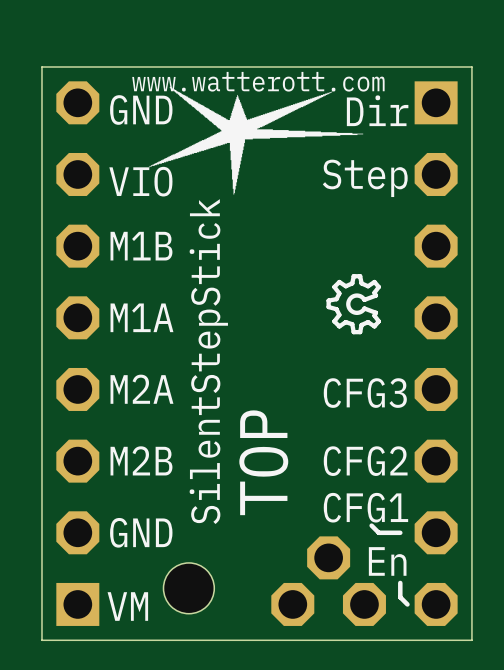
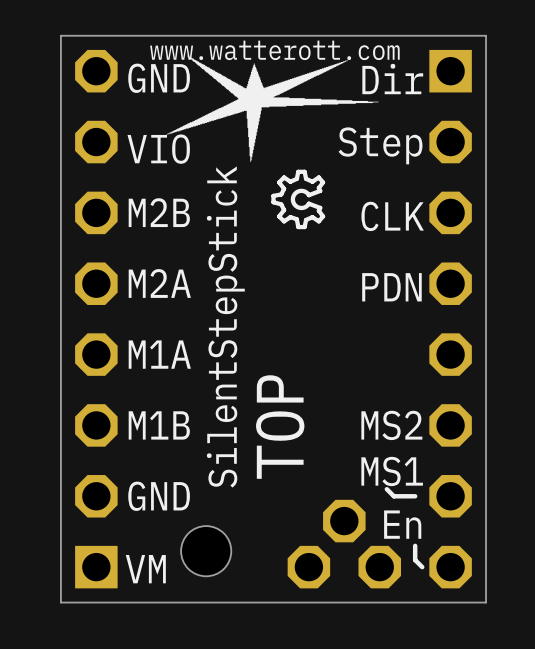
text: M1B (141, 246) -> M2B (159, 212)
text: none -> CLK (392, 216)
drawing position: (353, 304) -> (298, 199)
text: M1A (141, 317) -> M2A (159, 283)
text: none -> PDN (391, 287)
text: M2A (141, 389) -> M1A (159, 354)
text: CFG3 (365, 393) -> none
text: M2B (141, 460) -> M1B (159, 425)
text: CFG2 (365, 461) -> MS2 (391, 425)
text: CFG1 (365, 507) -> MS1 (392, 471)

